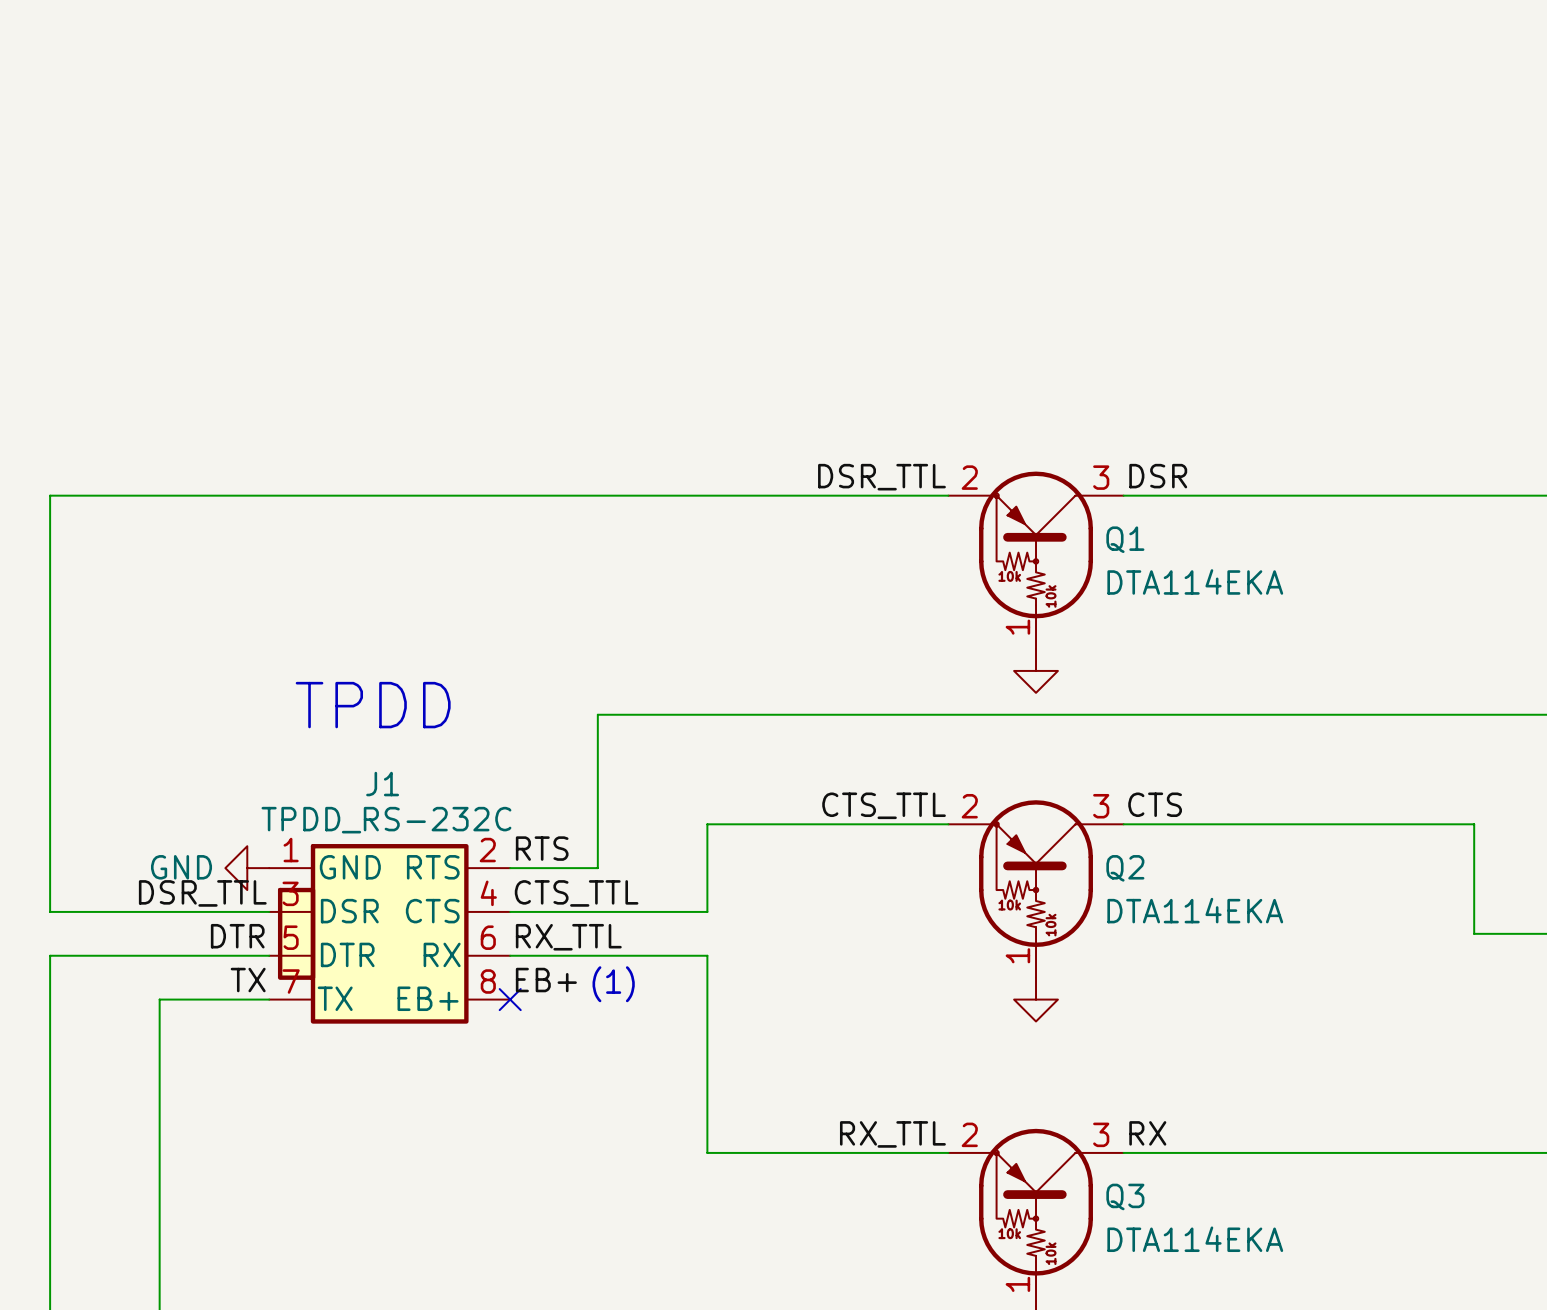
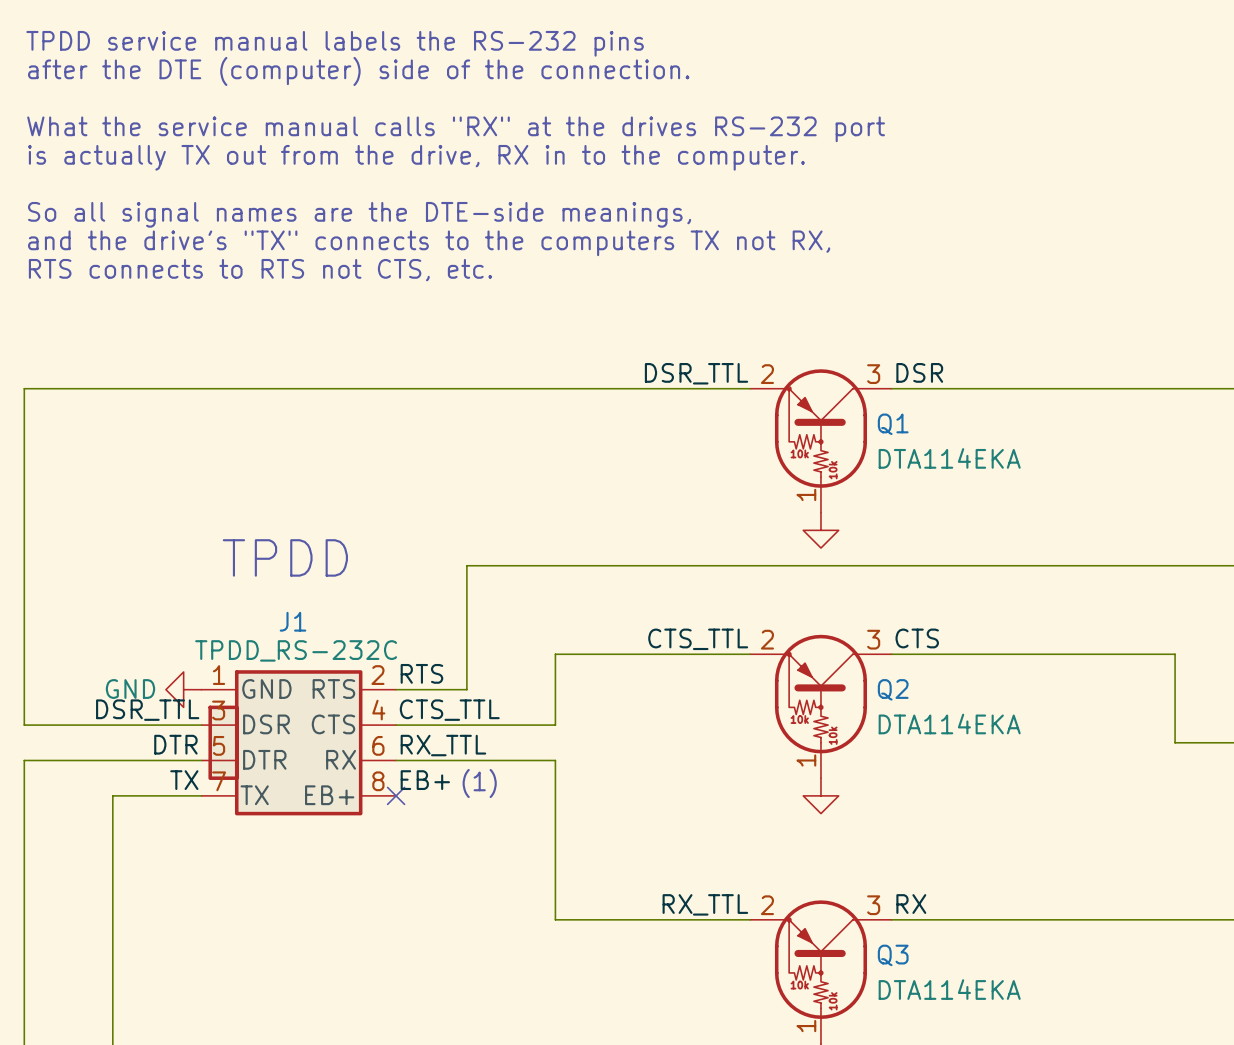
text: none -> TPDD service manual labels the RS-232 pins (335, 43)
text: none -> after the DTE (computer) side of the connection. (358, 71)
text: none -> What the service manual calls "RX" at the drives RS-232 port (456, 129)
text: none -> is actually TX out from the drive, RX in to the computer. (416, 157)
text: none -> So all signal names are the DTE-side meanings, (359, 214)
text: none -> and the drive's "TX" connects to the computers TX not RX, (429, 243)
text: none -> RTS connects to RTS not CTS, etc. (260, 270)

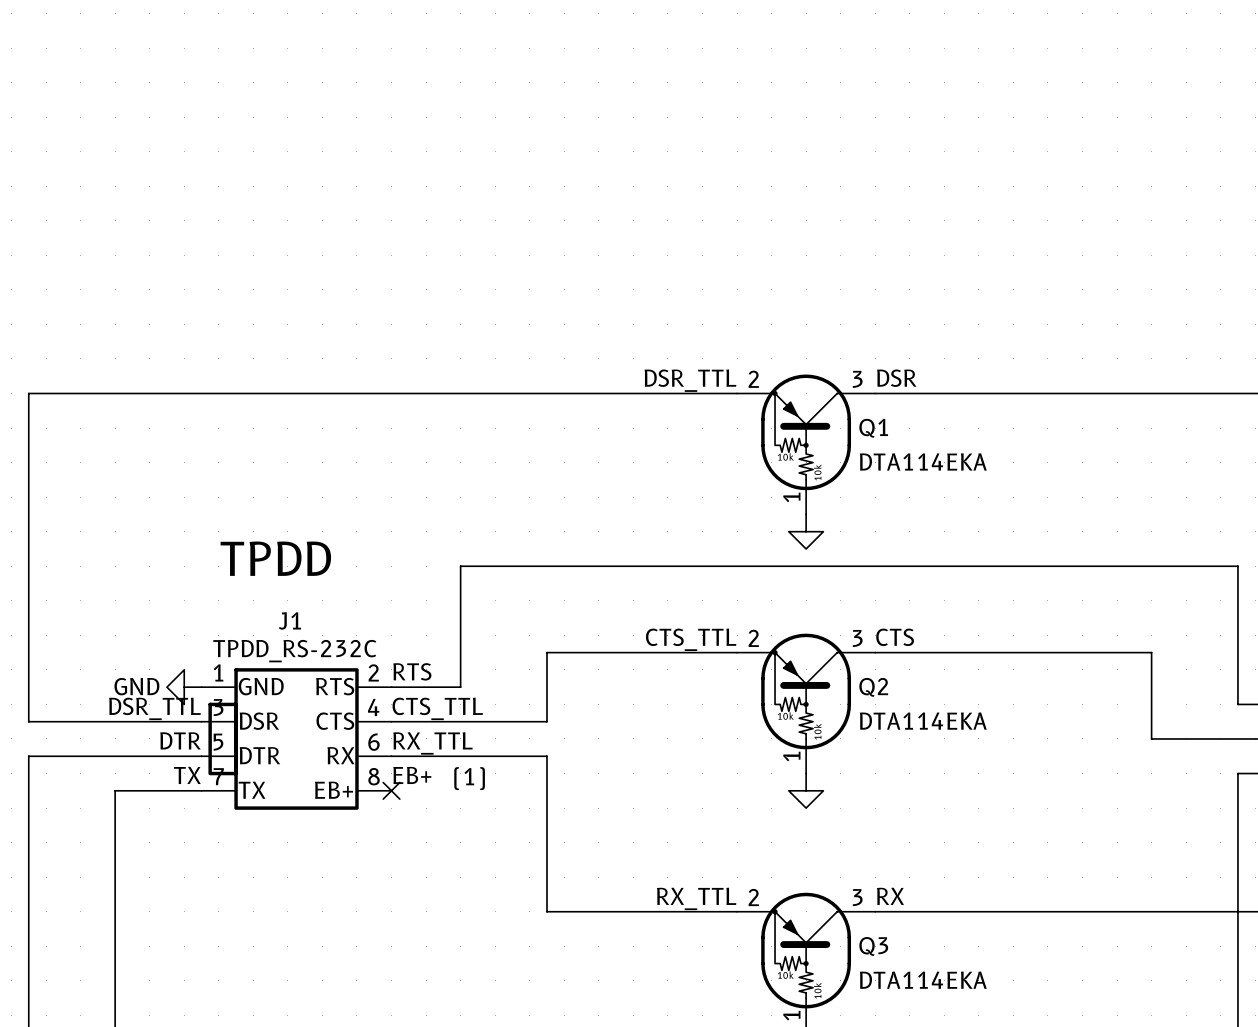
text: TPDD service manual labels the RS-232 pins (335, 43) -> none
text: after the DTE (computer) side of the connection. (358, 71) -> none
text: What the service manual calls "RX" at the drives RS-232 port (456, 129) -> none
text: is actually TX out from the drive, RX in to the computer. (416, 157) -> none
text: So all signal names are the DTE-side meanings, (359, 214) -> none
text: and the drive's "TX" connects to the computers TX not RX, (429, 243) -> none
text: RTS connects to RTS not CTS, etc. (260, 270) -> none

